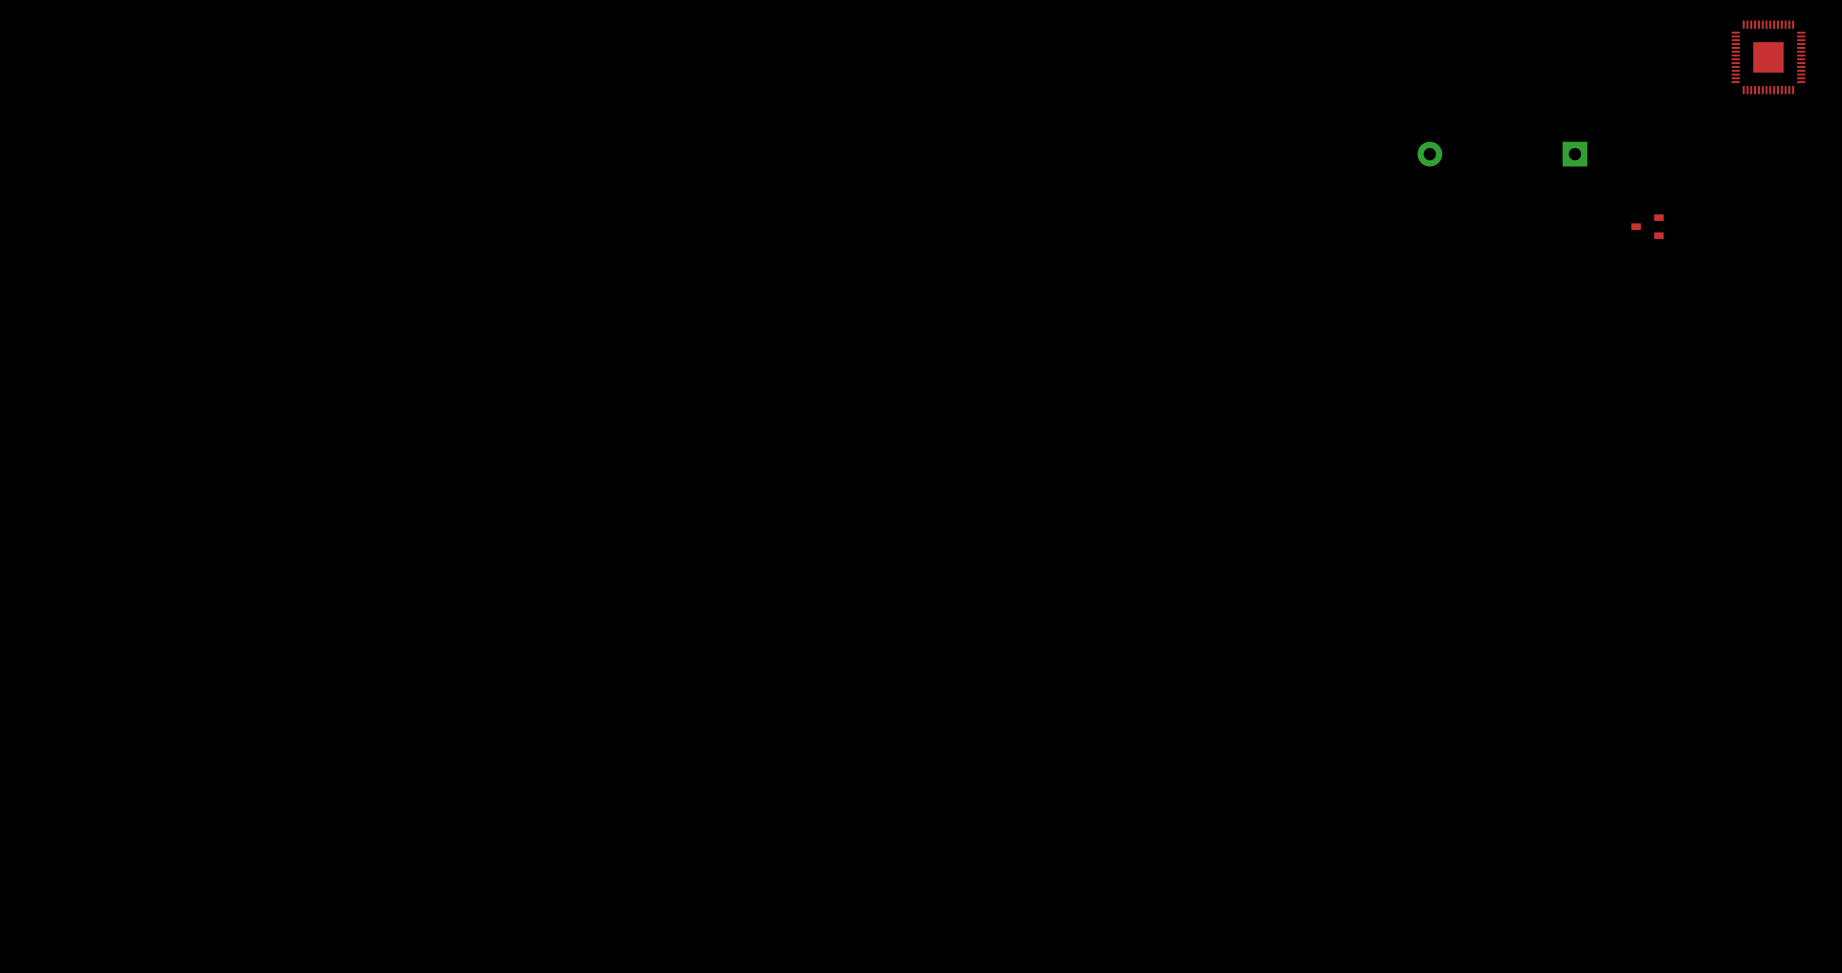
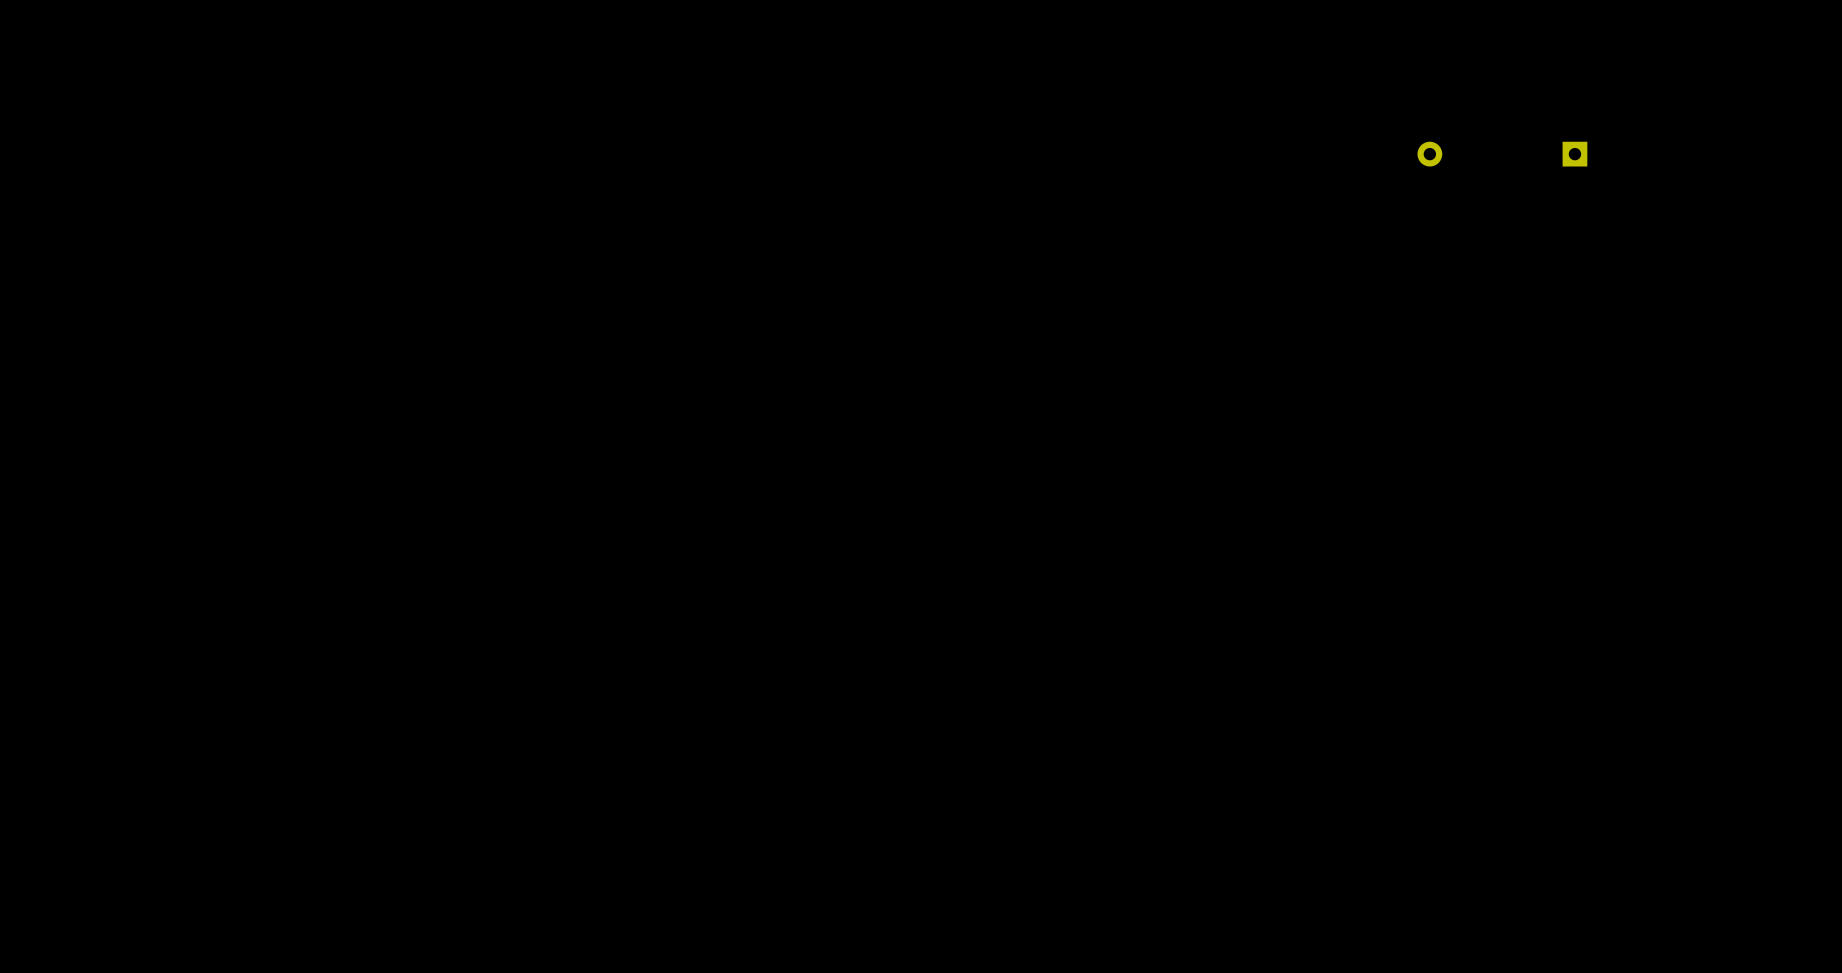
part: (1768, 57) -> none
part: (1647, 226) -> none

